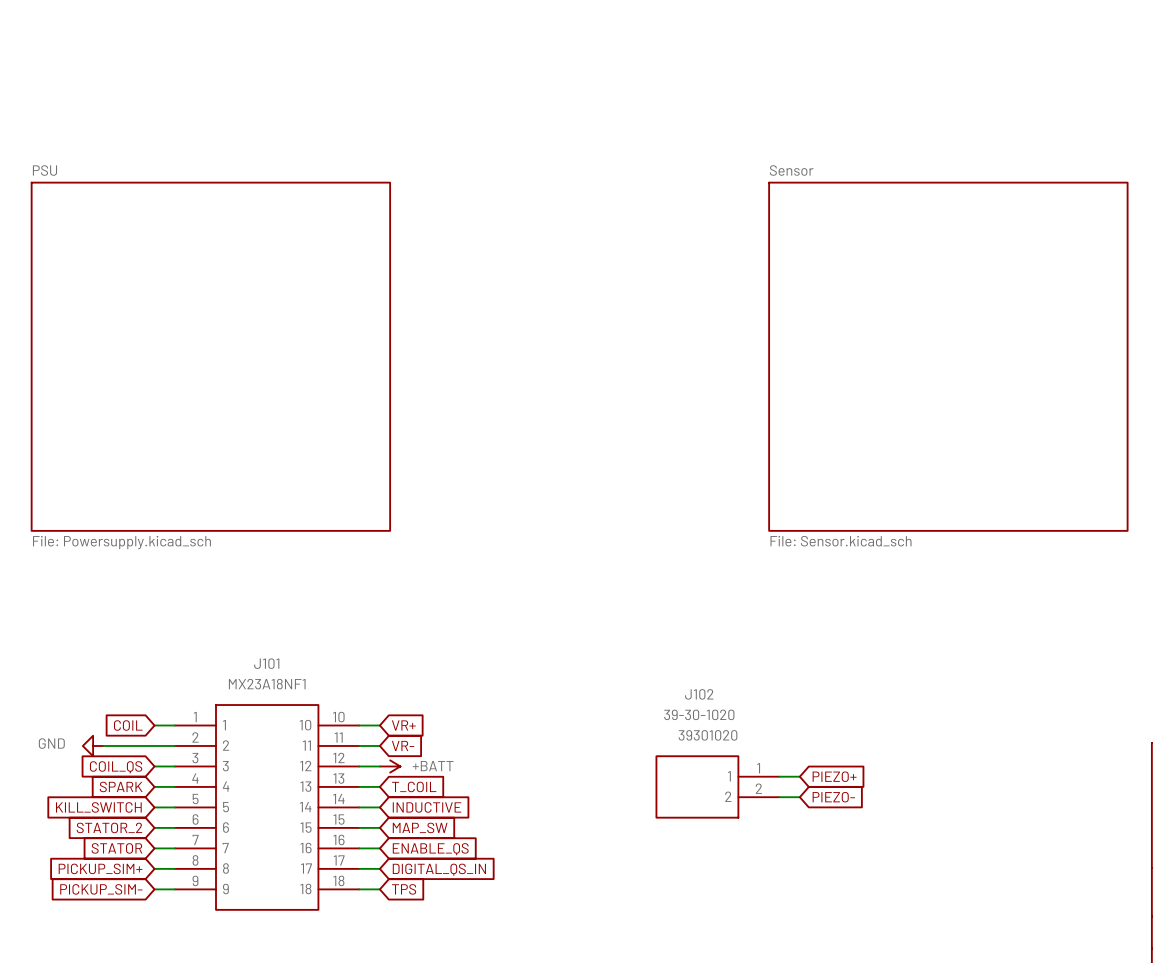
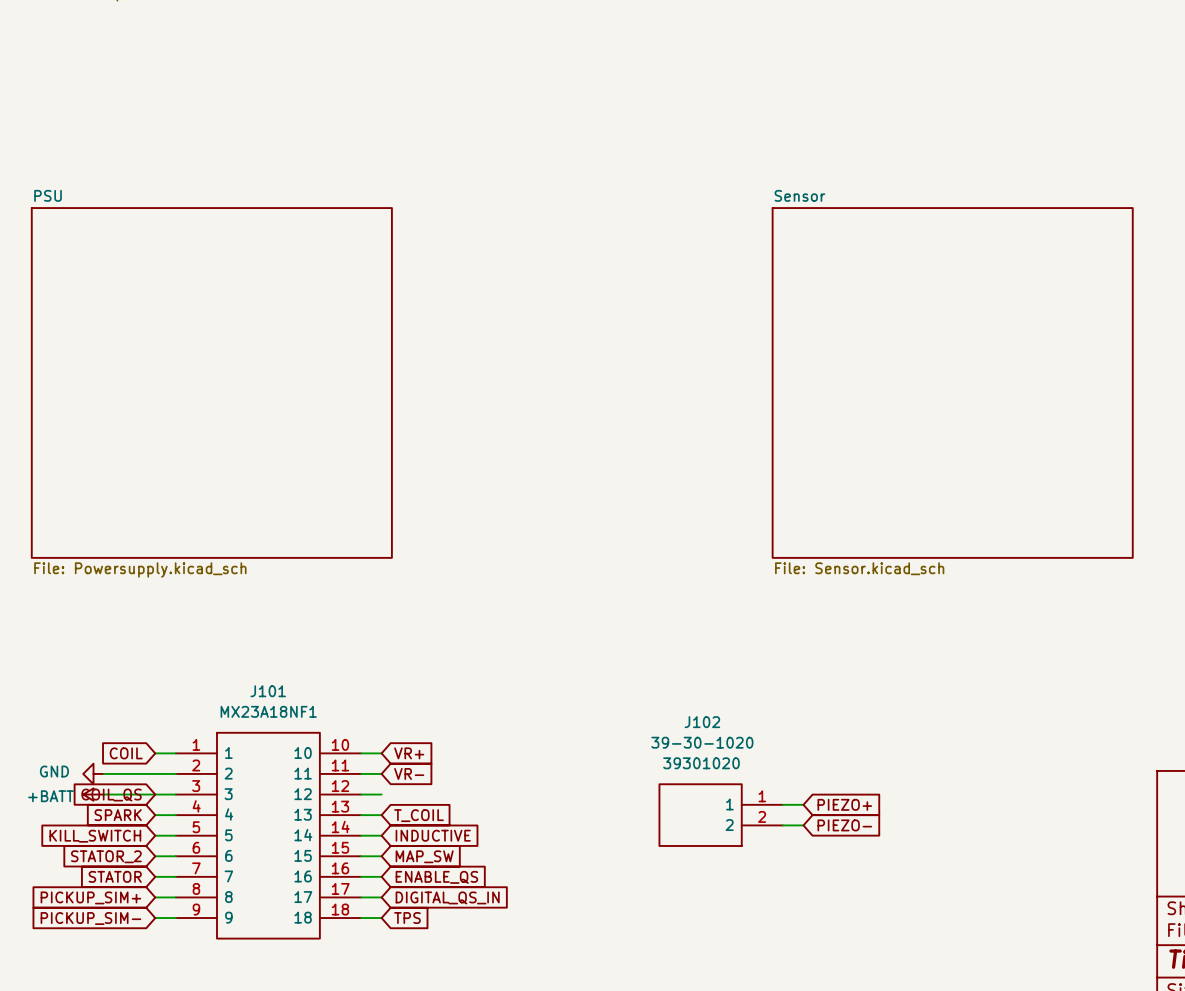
power symbol: none -> +BATT (93, 794)
wire: none -> (103, 794) (155, 794)
power symbol: +BATT (390, 766) -> none

